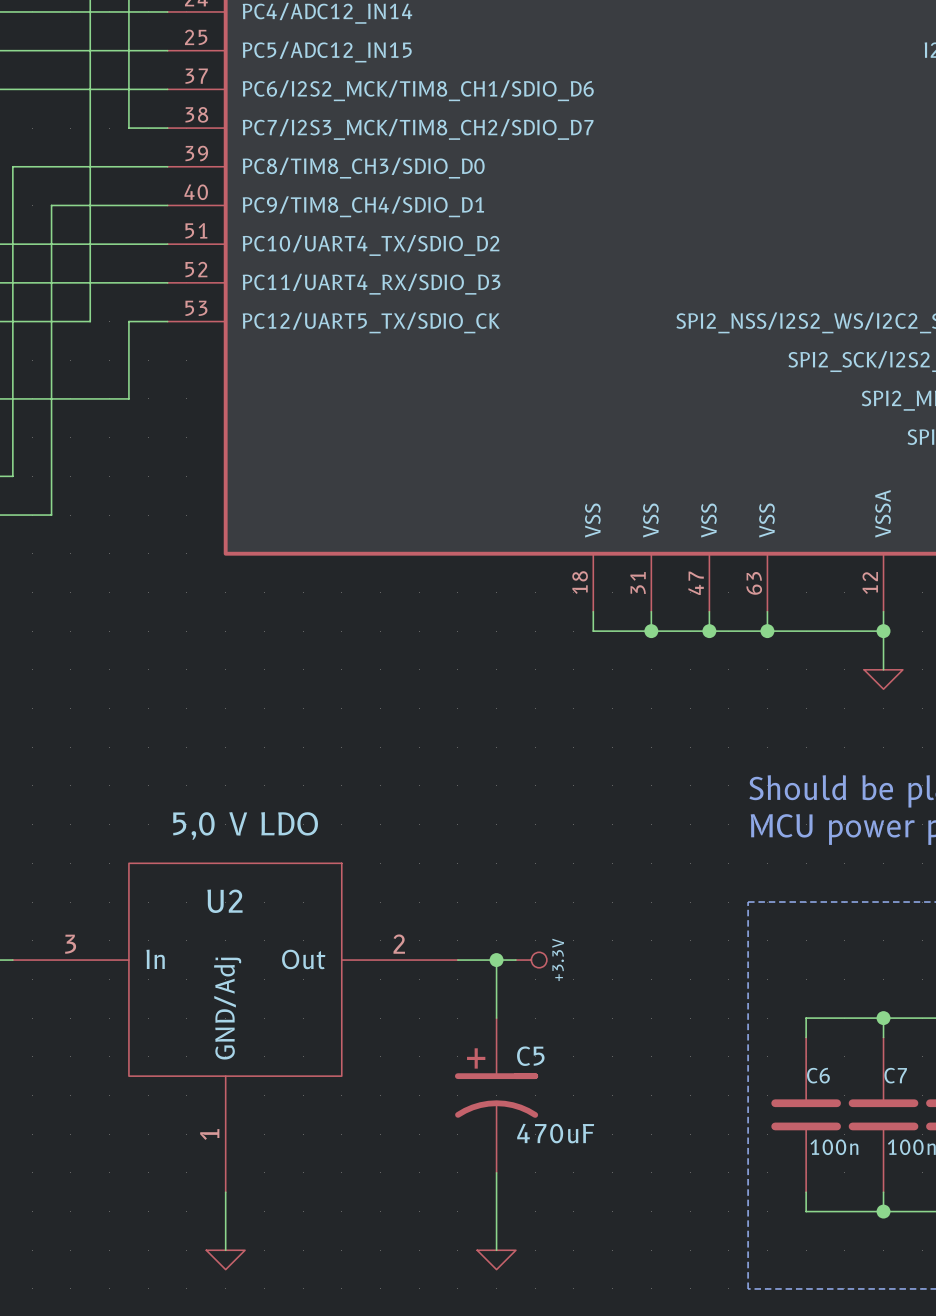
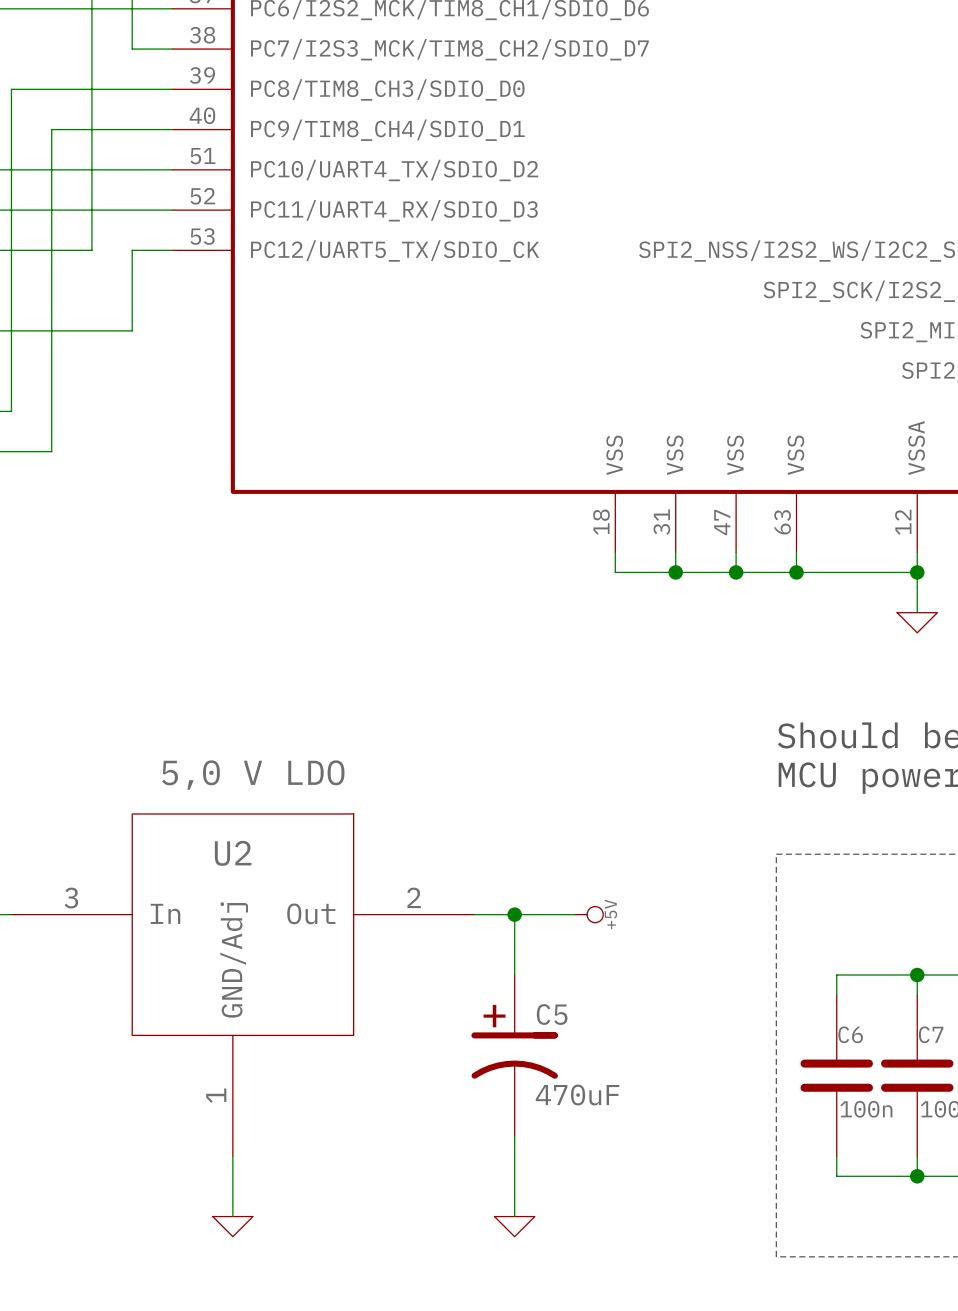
wire: none -> (534, 914) (575, 914)
power symbol: +3.3V (531, 960) -> none
power symbol: none -> +5V (589, 914)

